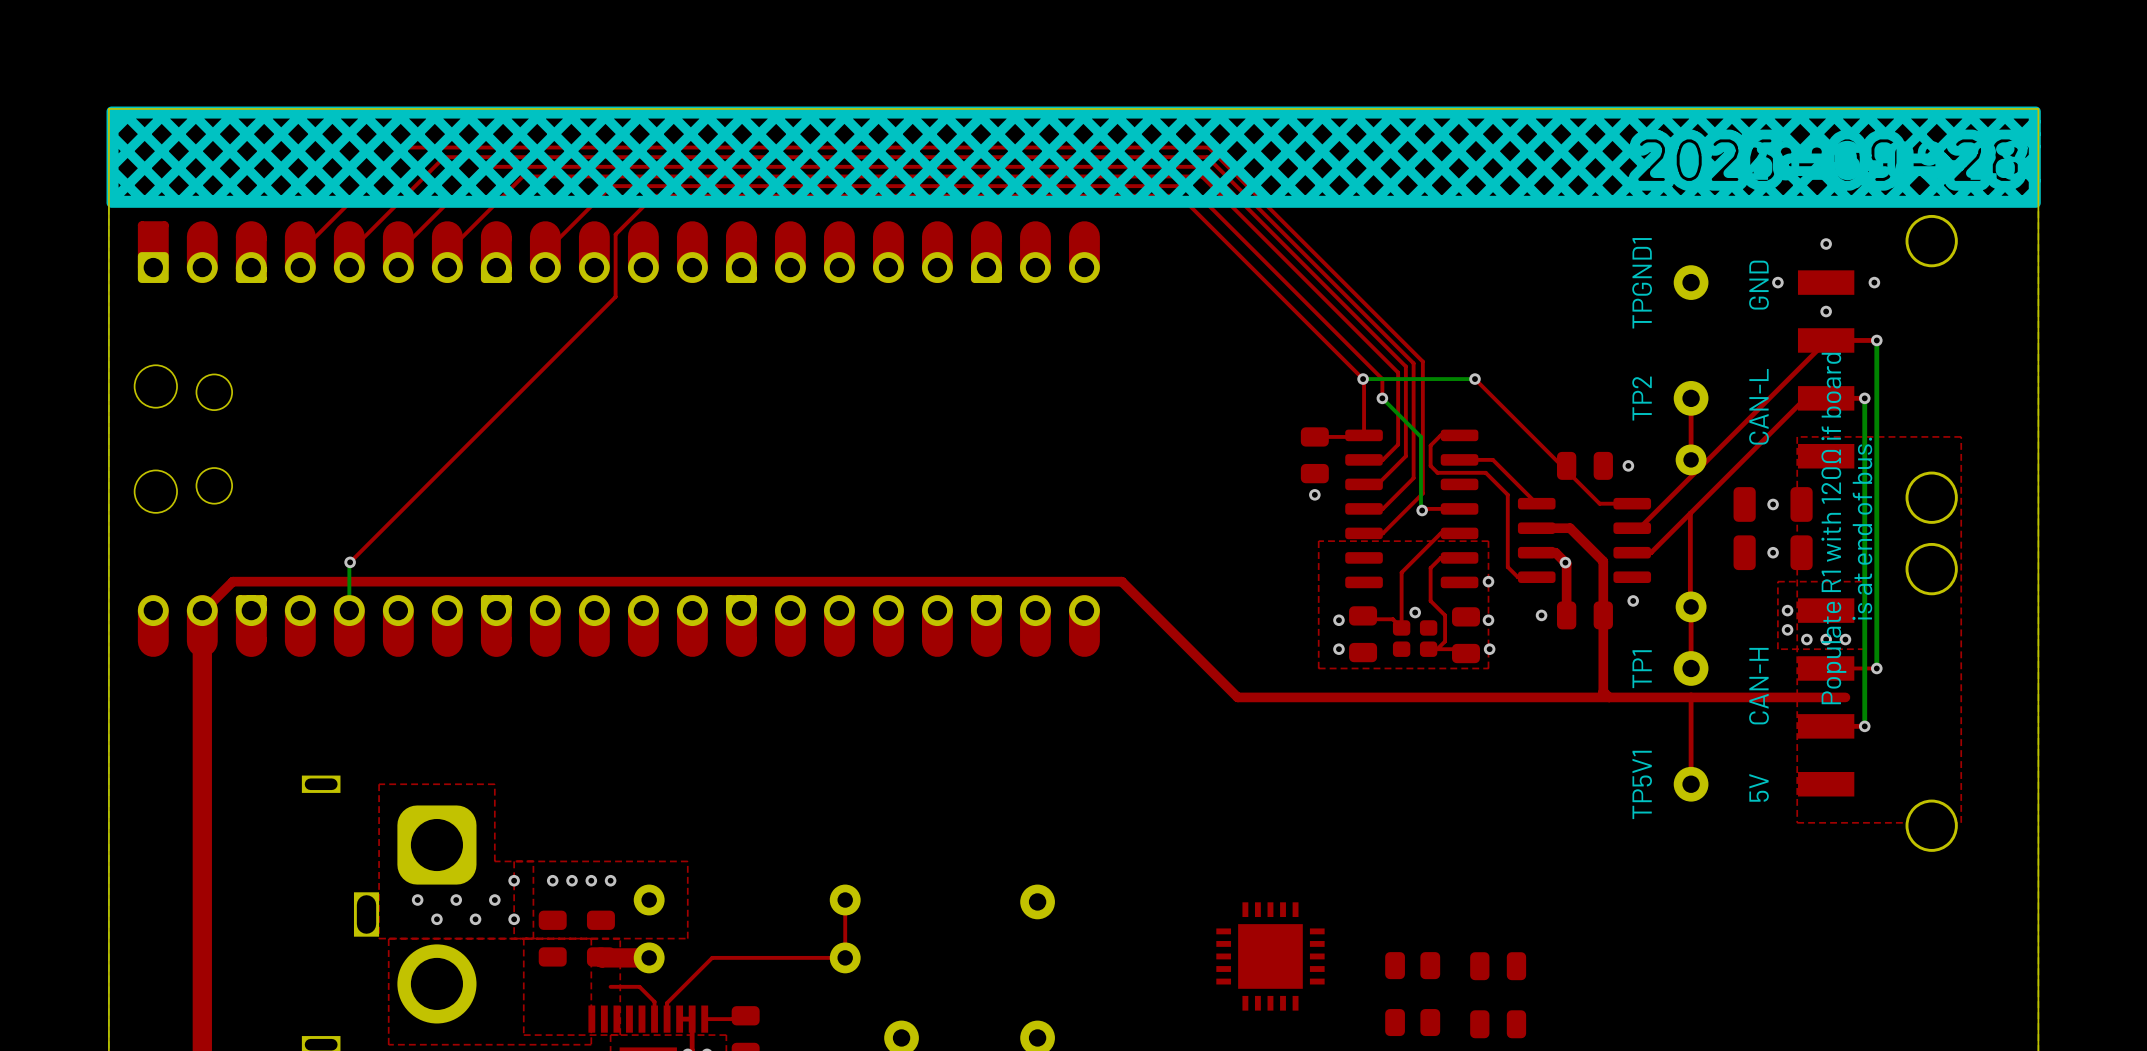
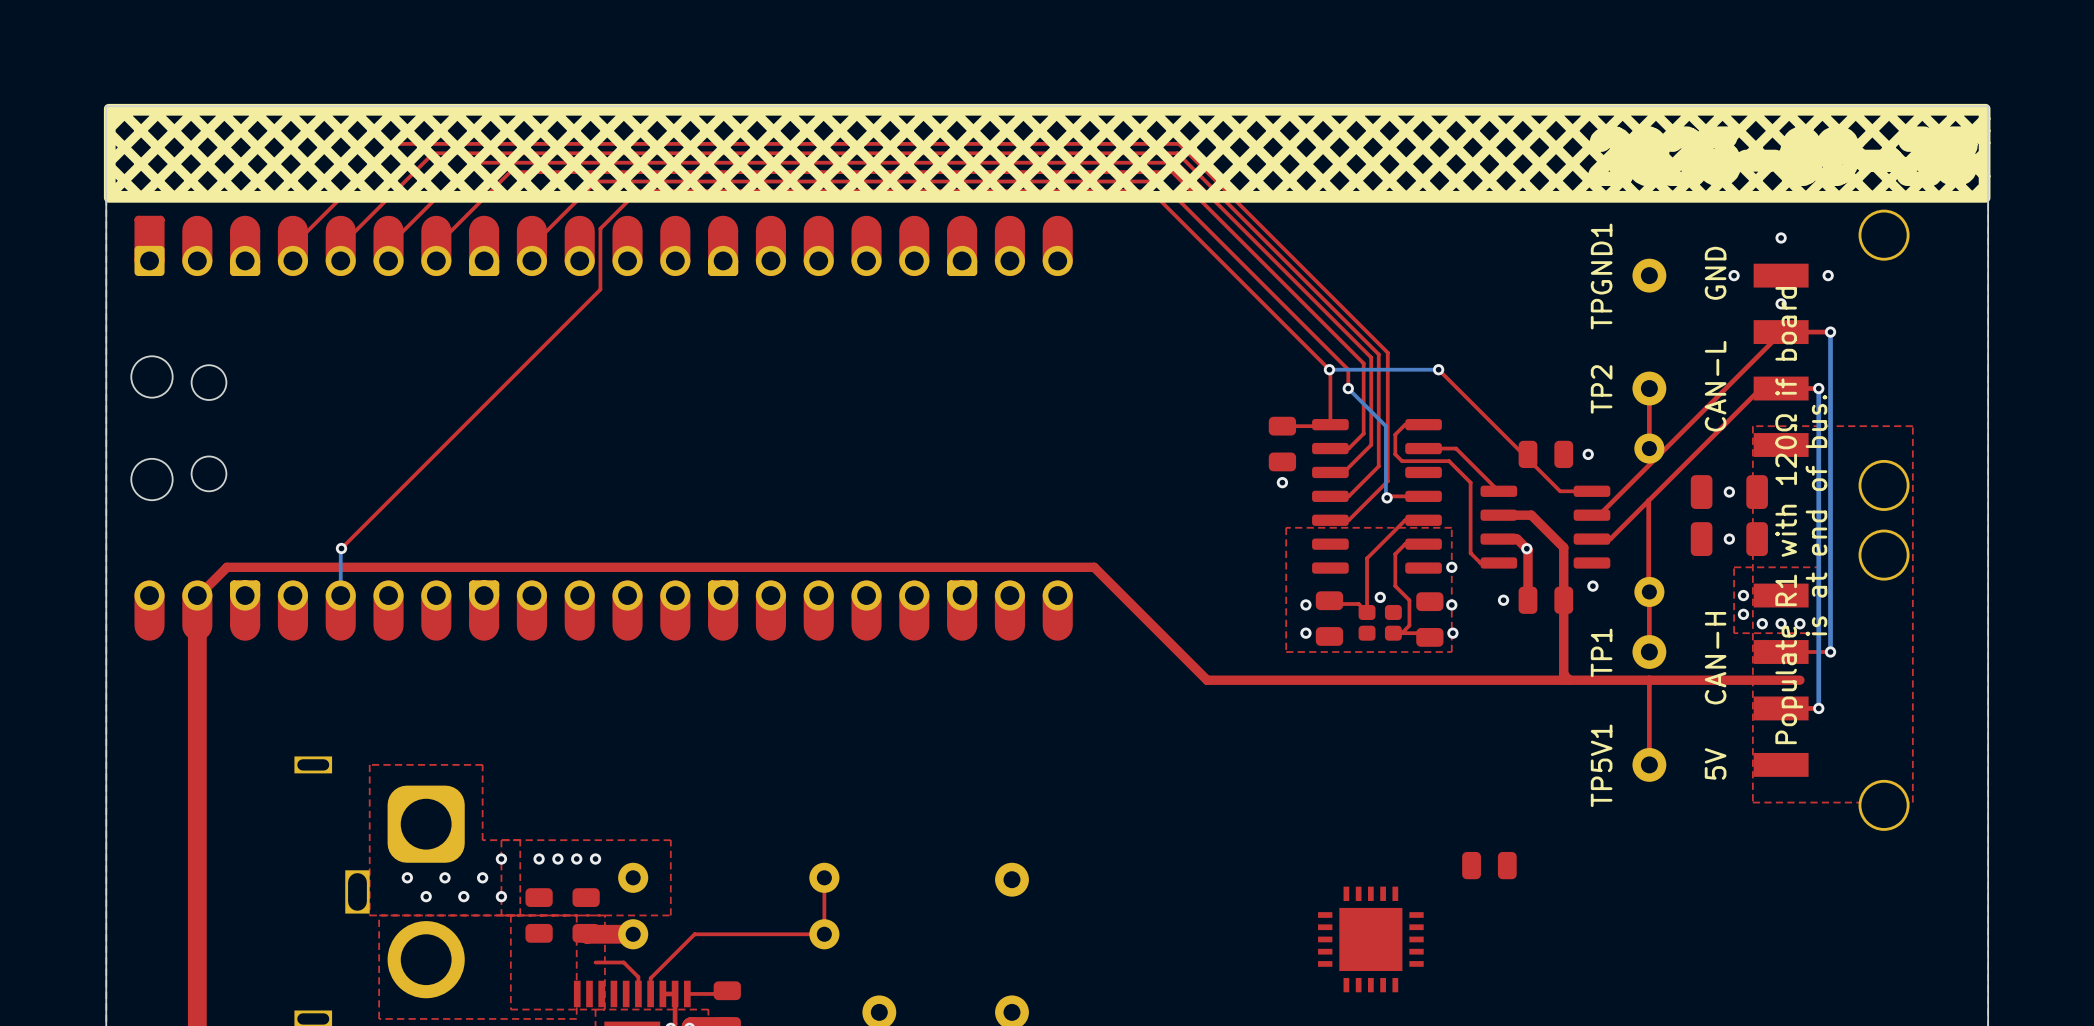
part: none -> (1489, 865)
part footprint: [1385, 952, 1441, 980] -> [1318, 886, 1424, 993]
part: (1270, 956) -> none
part: (1498, 966) -> none
part: (1412, 1022) -> none
part: (1498, 1024) -> none

